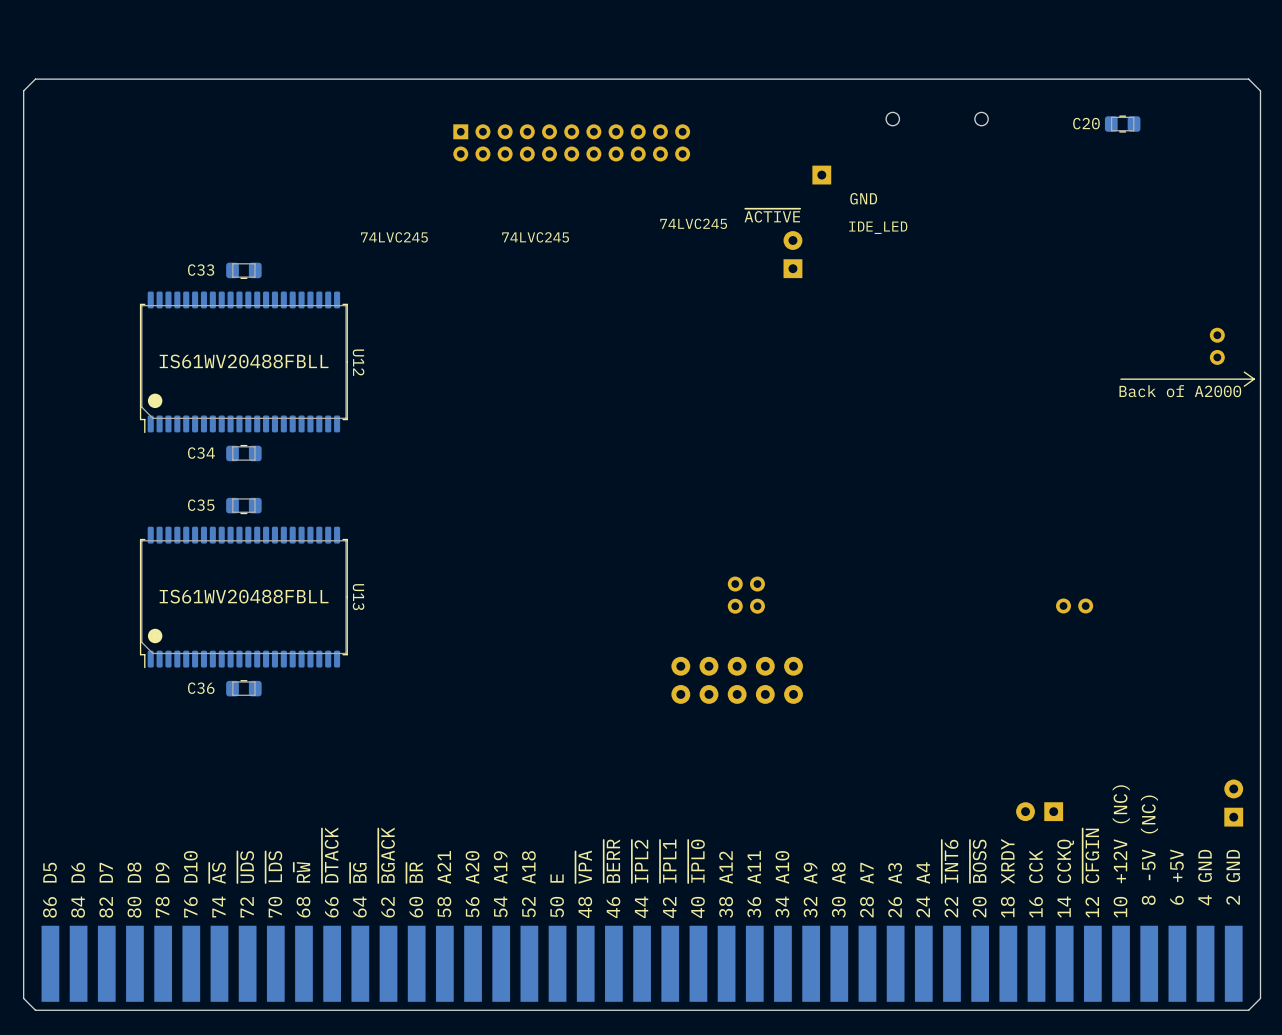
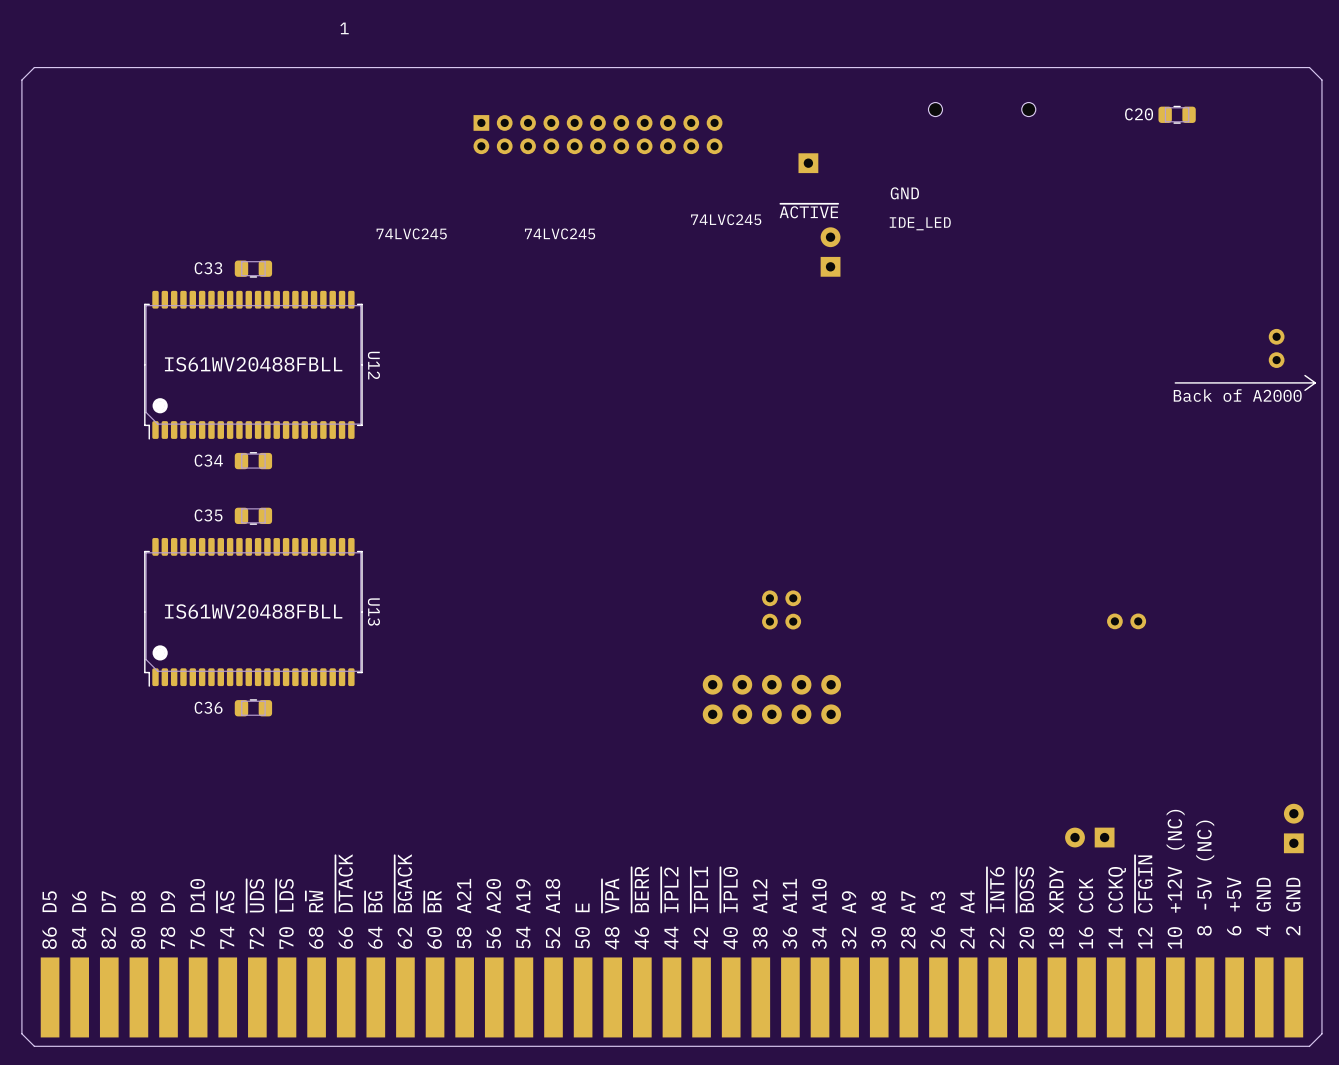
text: none -> 1 (344, 28)
part position: (821, 175) -> (808, 163)

